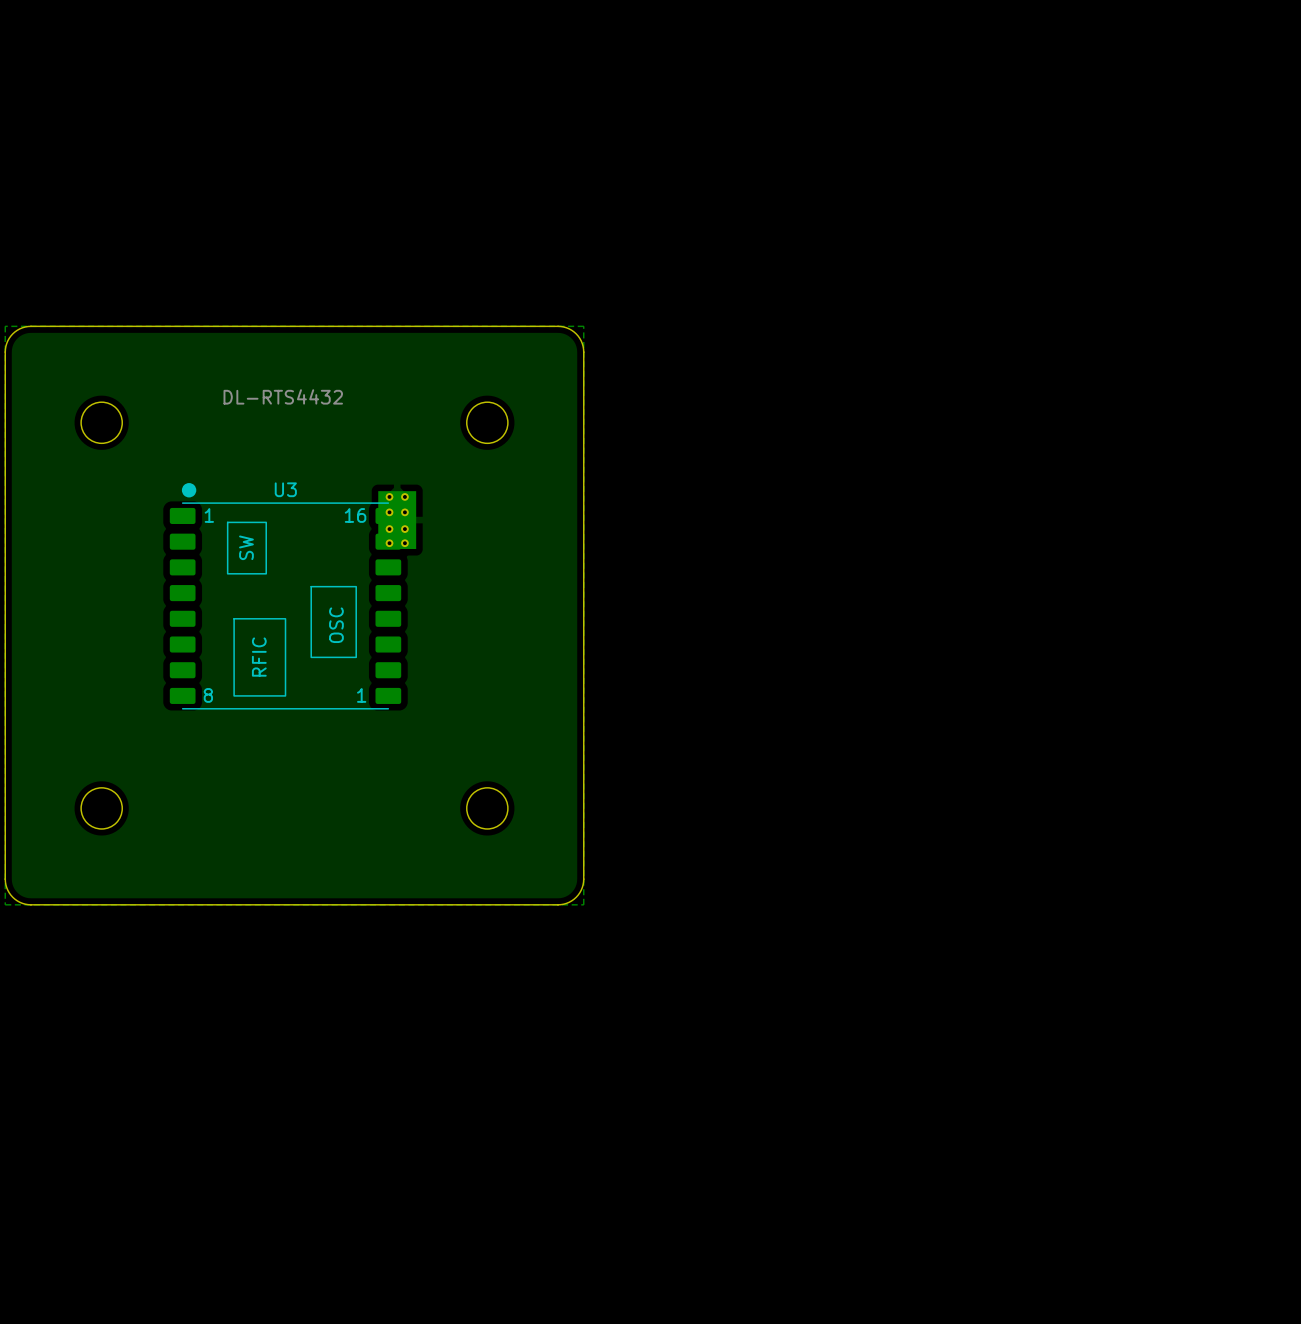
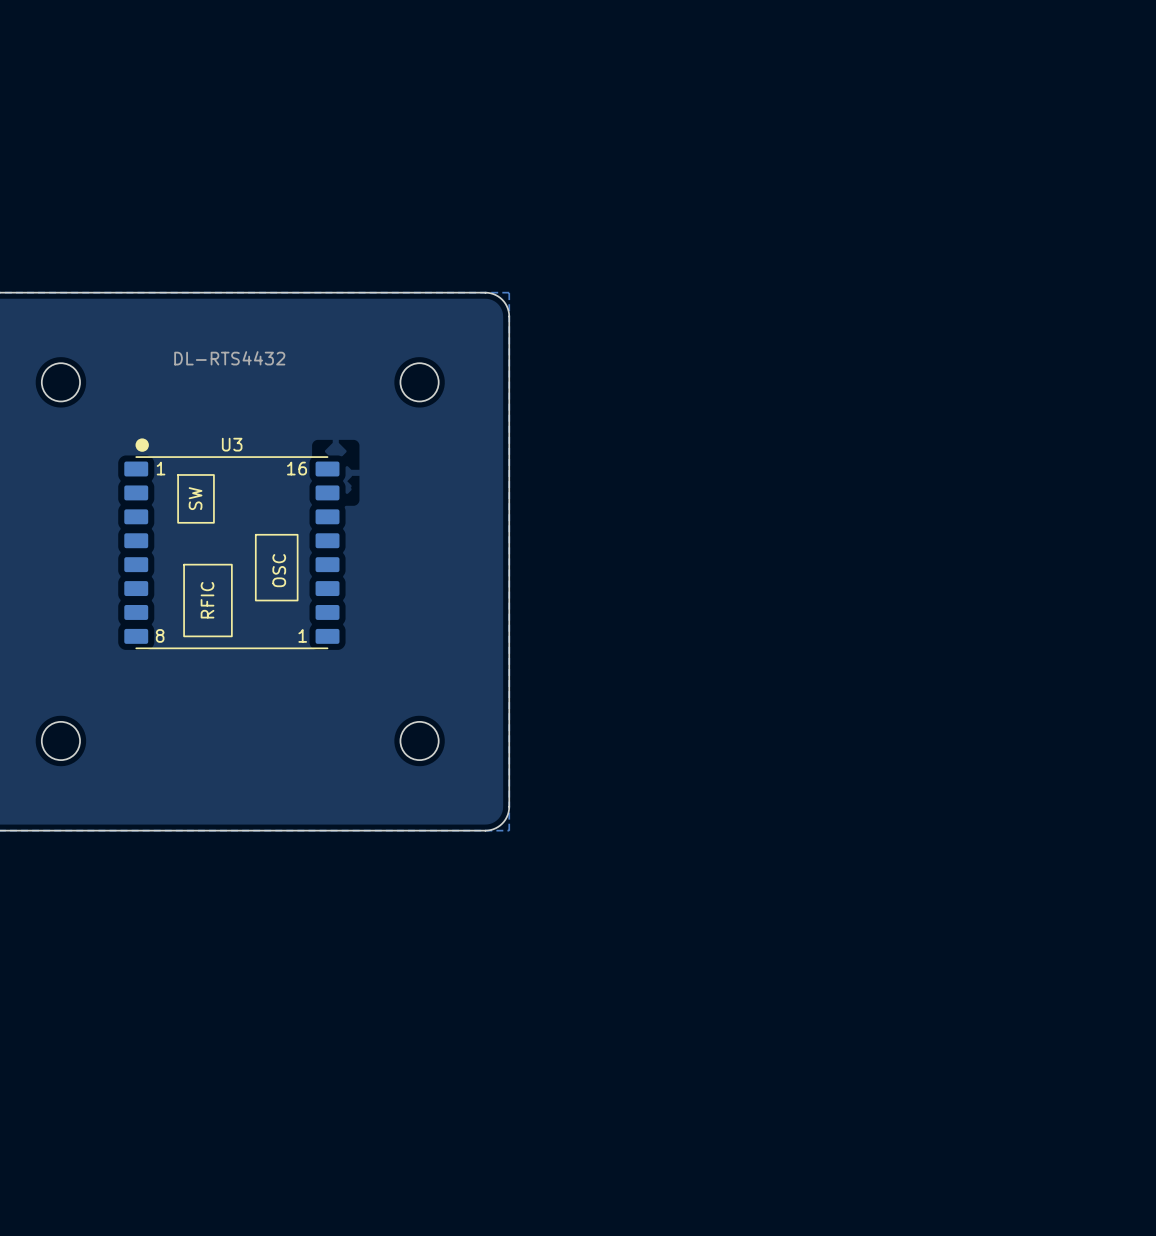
part: (397, 520) -> none

